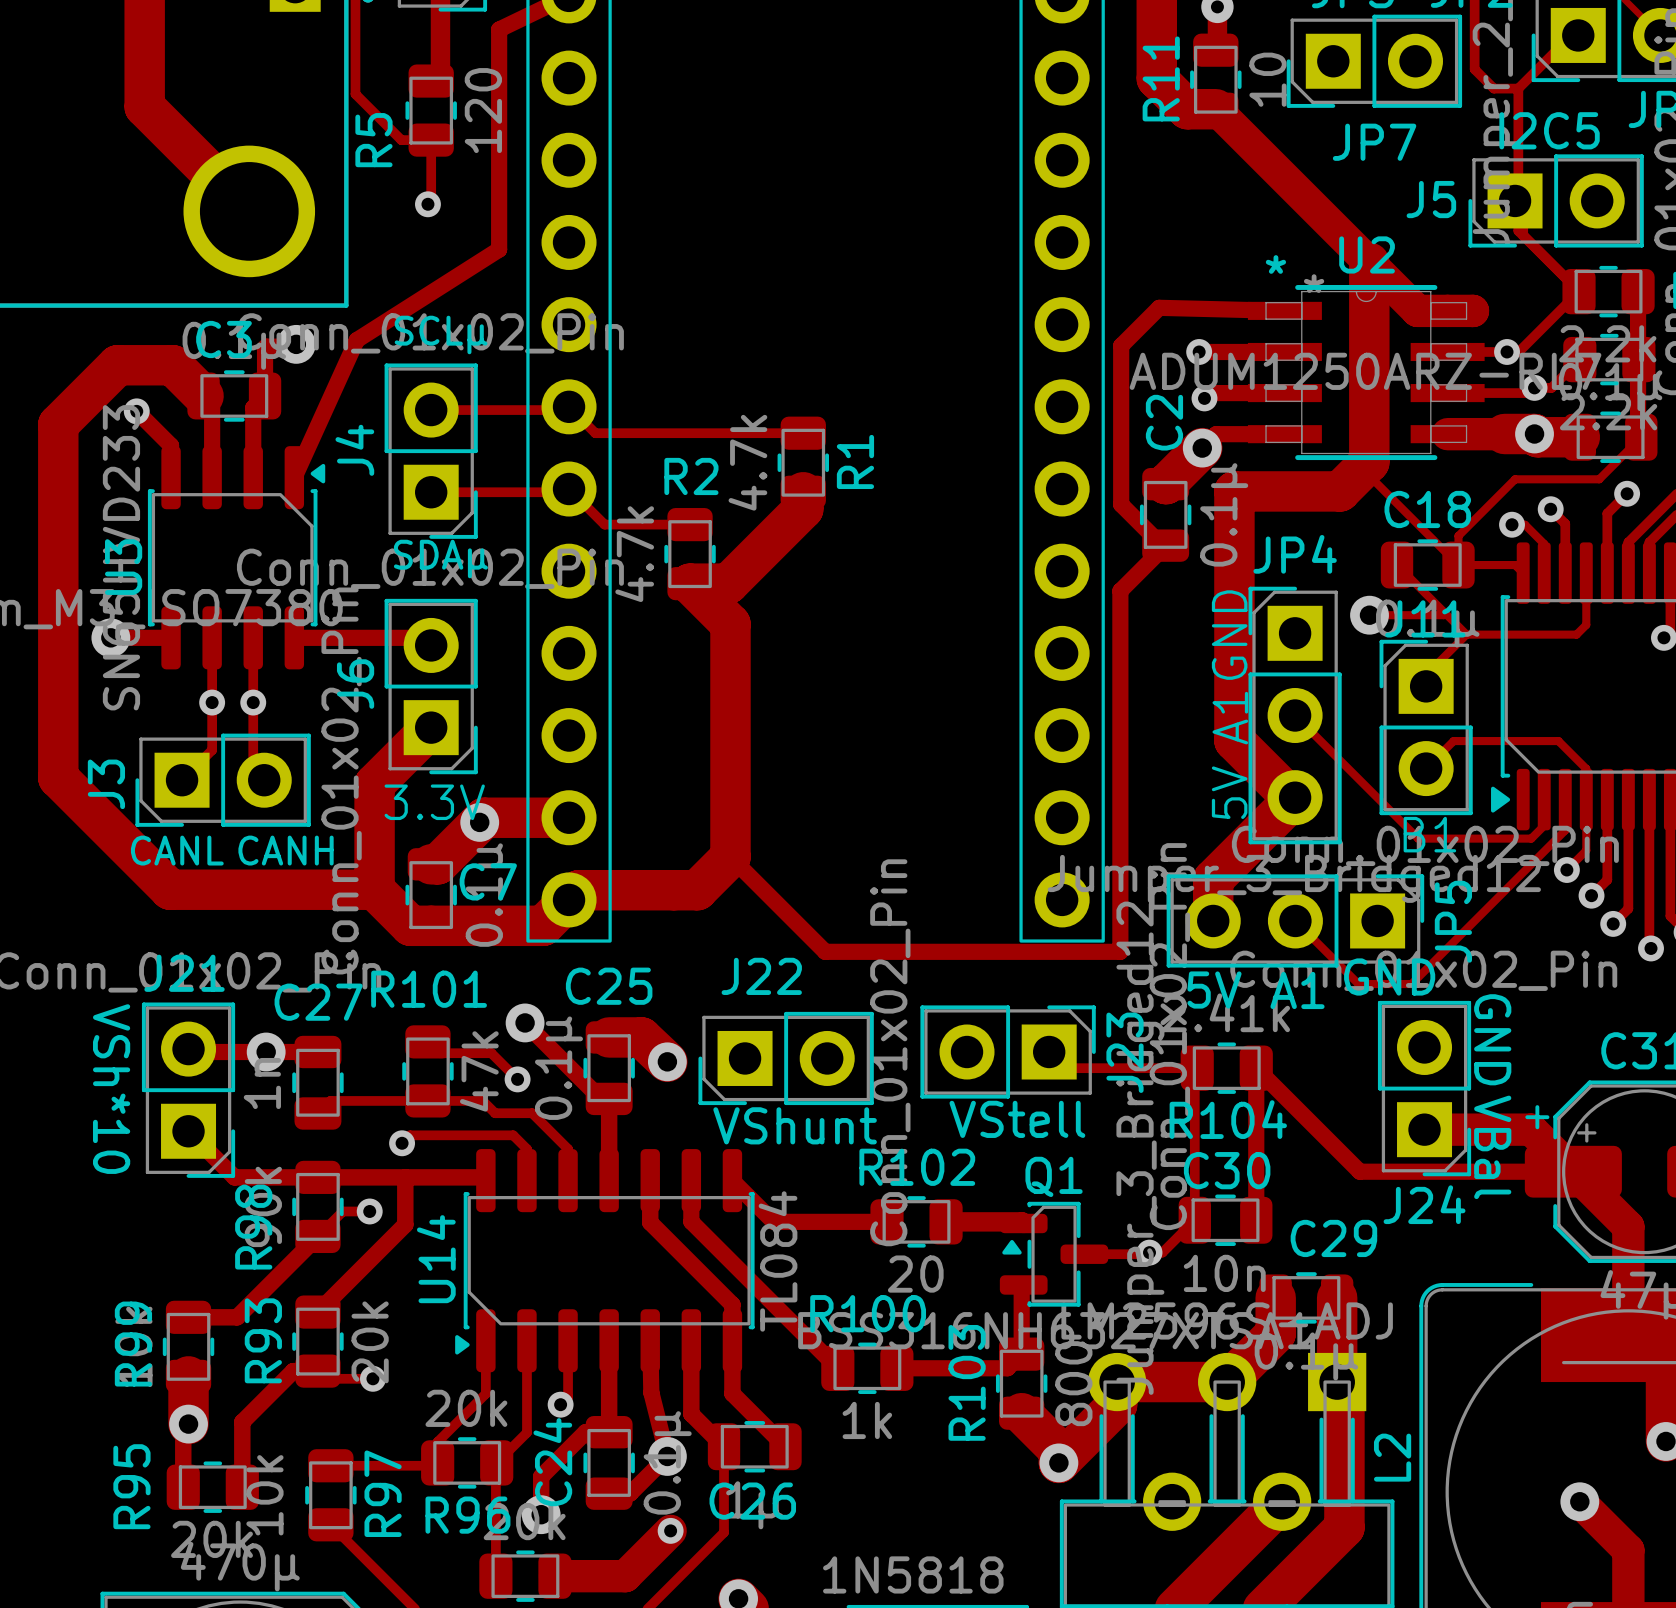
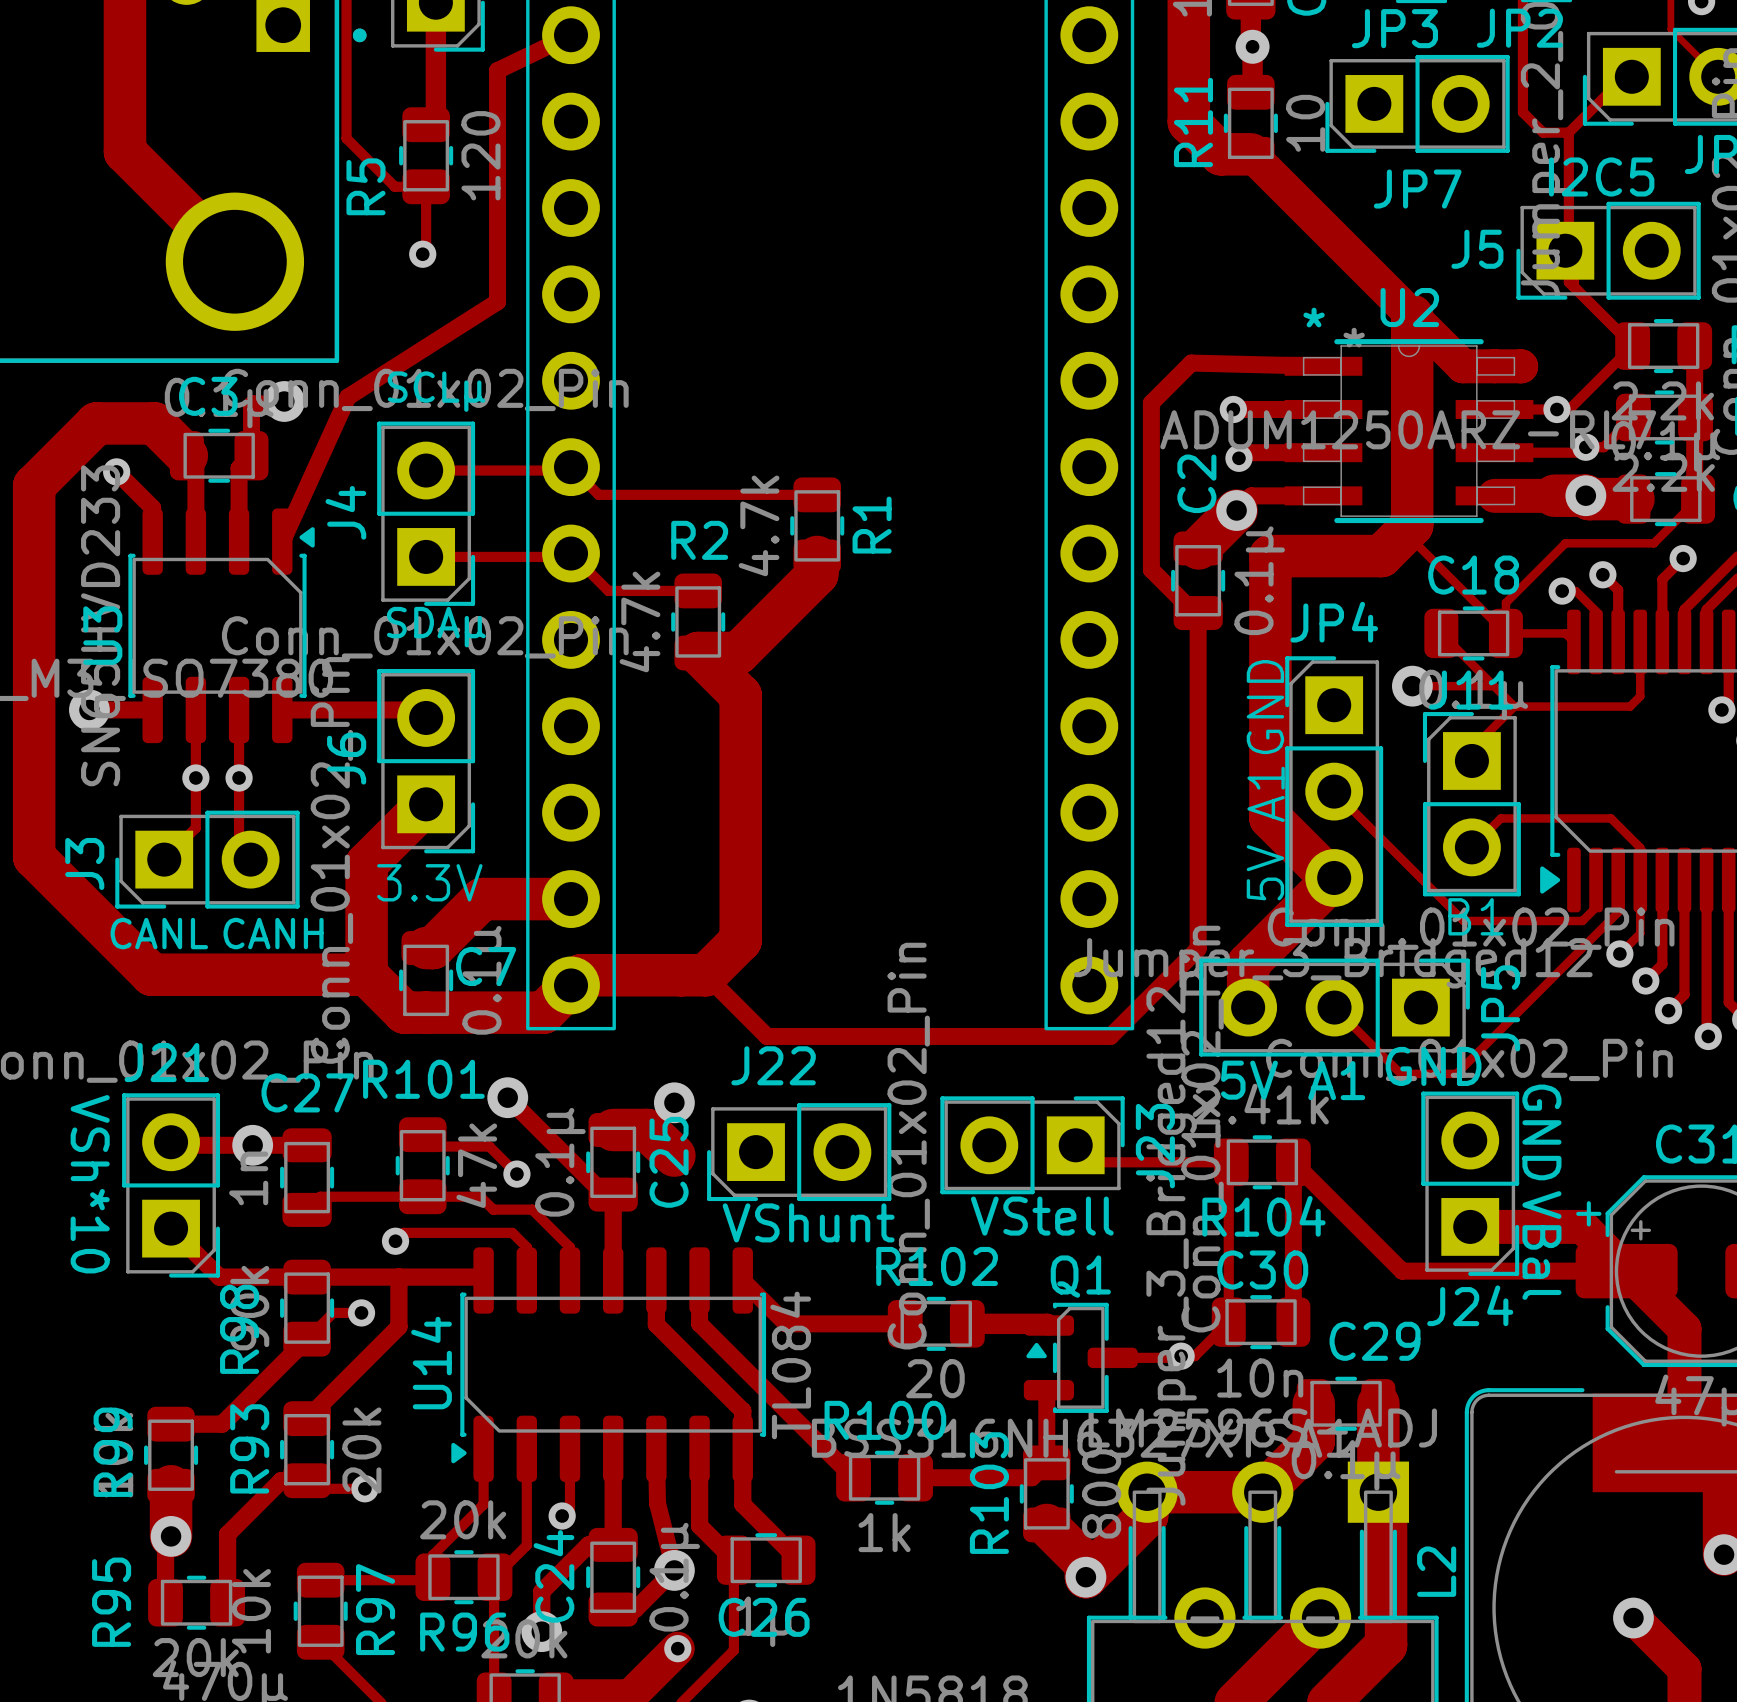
track: (1165, 545) (1120, 590) (1120, 951) (825, 951) (730, 857) -> (1198, 613) (1198, 948) (1110, 1036) (767, 1036) (705, 975)
via: (479, 822) -> none
C25 name rotation: 0° (609, 986) -> 90° counterclockwise (669, 1162)
via position: (525, 1022) -> (507, 1097)
via position: (667, 1061) -> (674, 1102)

